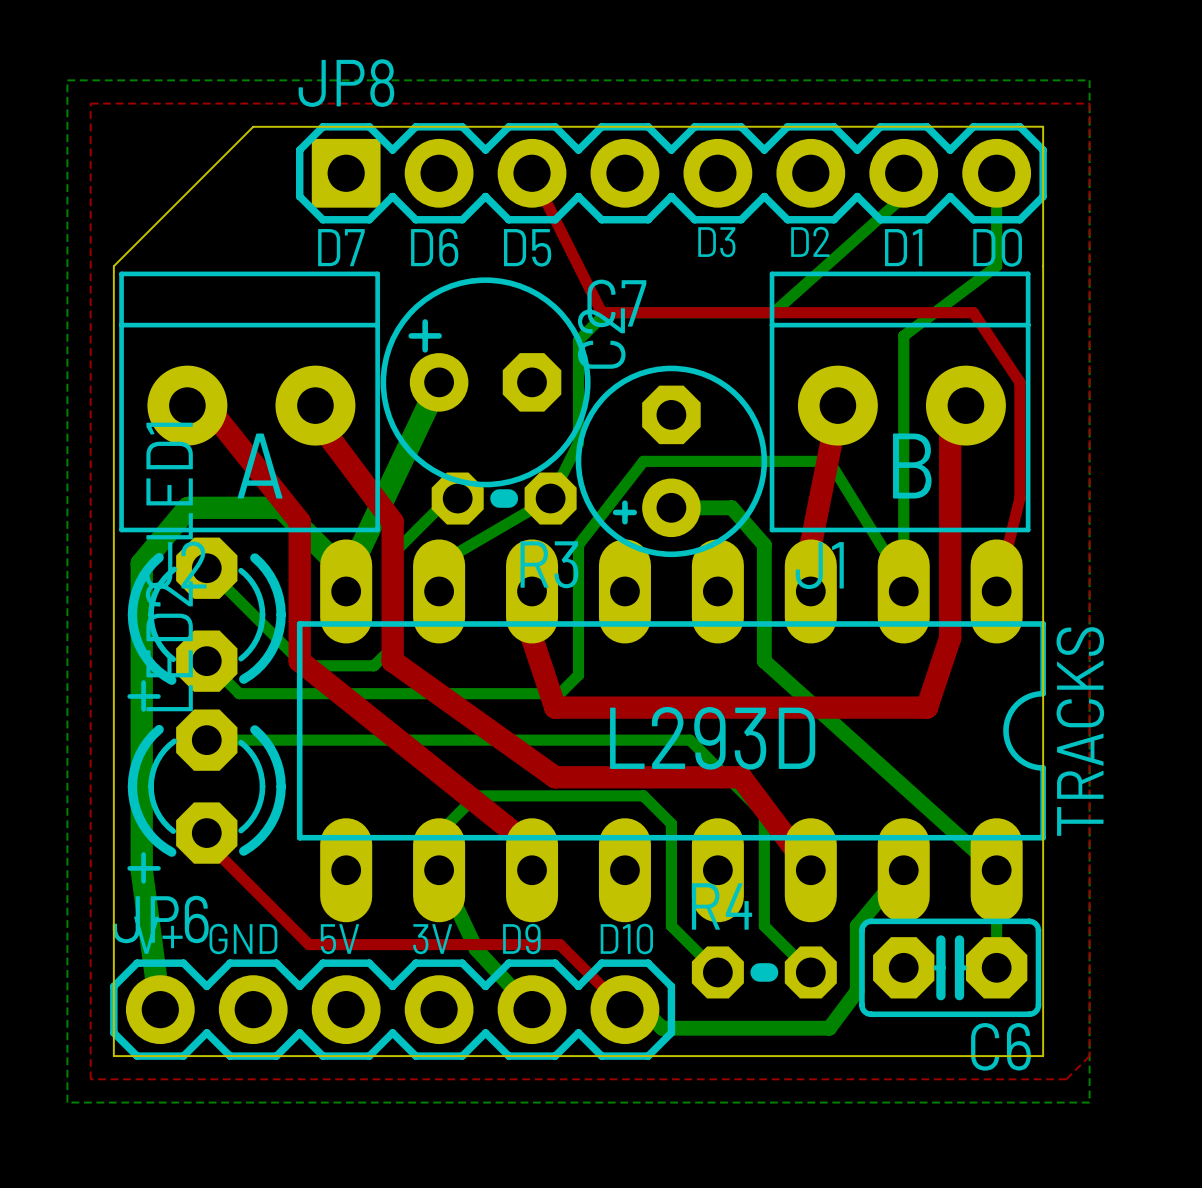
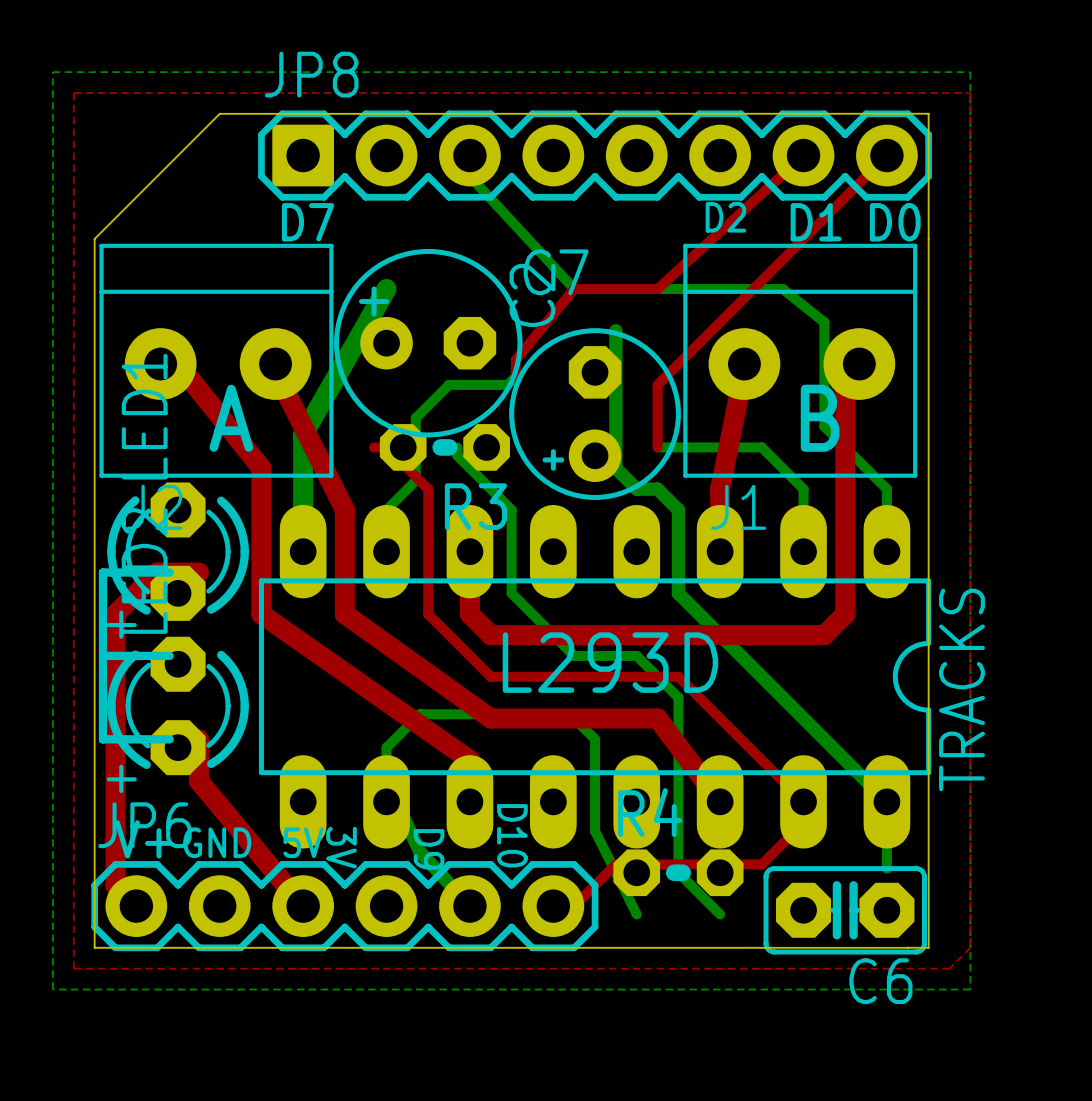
bottom track: none -> (469, 155) (469, 176) (574, 288) (782, 288) (824, 322) (824, 426) (886, 489) (886, 551)
top track: (532, 173) (601, 312) (973, 312) (1019, 382) (1019, 498) (996, 591) -> none
bottom track: (903, 173) (903, 196) (773, 312) (606, 312) (578, 340) (578, 442) (550, 498) (439, 563) (439, 568) -> (515, 376) (507, 384) (449, 384) (415, 418) (415, 480) (386, 509)
top track: none -> (803, 155) (657, 288) (574, 288) (515, 359) (515, 376)
bottom track: (996, 173) (996, 266) (903, 335) (903, 544) -> (657, 447) (761, 447) (803, 489)
top track: none -> (886, 155) (657, 384) (657, 447)
text: D3 (716, 242) -> none
text: D6 (434, 247) -> none
text: D5 (527, 247) -> none
bottom track: (439, 382) (355, 558) (346, 591) -> none
top track: (322, 428) (392, 521) (392, 568) -> (282, 384) (344, 509)
bottom track: (457, 498) (448, 498) (392, 554) (392, 647) (374, 665) (304, 665) (206, 568) -> none
bottom track: (671, 507) (731, 507) (764, 544) (764, 568) -> (615, 330) (615, 468) (636, 489) (657, 489) (678, 509)
bottom track: (578, 568) (578, 544) (643, 461) (829, 461) (903, 582) -> (511, 509) (457, 455) (457, 447)
bottom track: (346, 572) (281, 507) (188, 507) (141, 563) (141, 870) (160, 1009) -> (303, 514) (303, 434) (386, 288)
line: none -> (169, 572) (103, 572) (103, 739) (169, 739)
top track: none -> (198, 572) (157, 572) (115, 614) (115, 885) (136, 906)
top track: (532, 637) (555, 707) -> (469, 572) (469, 614) (490, 635)
top track: (950, 637) (926, 707) -> (845, 572) (845, 614) (824, 635)
bottom track: (206, 661) (239, 693) (559, 693) (578, 675) (578, 661) -> none
top track: (299, 661) (532, 847) -> (261, 593) (261, 614) (469, 760)
top track: (392, 661) (555, 777) (741, 777) (810, 870) -> (344, 593) (344, 614) (490, 718) (657, 718) (720, 801)
bottom track: (764, 661) (996, 870) (996, 893) -> (678, 593) (886, 801)
line: none -> (103, 655) (169, 655)
TRACKS position: (671, 730) -> (595, 676)
bottom track: (206, 740) (690, 740) (764, 814) -> (511, 593) (574, 655) (636, 655) (678, 697) (678, 730)
top track: none -> (198, 739) (198, 781) (303, 906)
top track: (206, 833) (206, 842) (309, 944) (559, 944) (624, 1009) -> (374, 447) (386, 447) (428, 489) (428, 614) (490, 676) (678, 676) (803, 801) (803, 822) (761, 864) (615, 864) (574, 906) (553, 906)
bottom track: (903, 870) (857, 925) (857, 991) (829, 1028) (662, 1028) (643, 1009) (624, 1009) -> none
bottom track: (671, 925) (717, 972) -> (595, 831) (636, 914)
bottom track: (764, 925) (810, 972) -> (678, 831) (678, 872) (720, 914)
text rotation: 0° (432, 939) -> 90° clockwise (341, 847)
text rotation: 0° (521, 939) -> 90° clockwise (429, 849)
text rotation: 0° (626, 939) -> 90° clockwise (512, 835)
C6 position: (950, 967) -> (845, 910)

